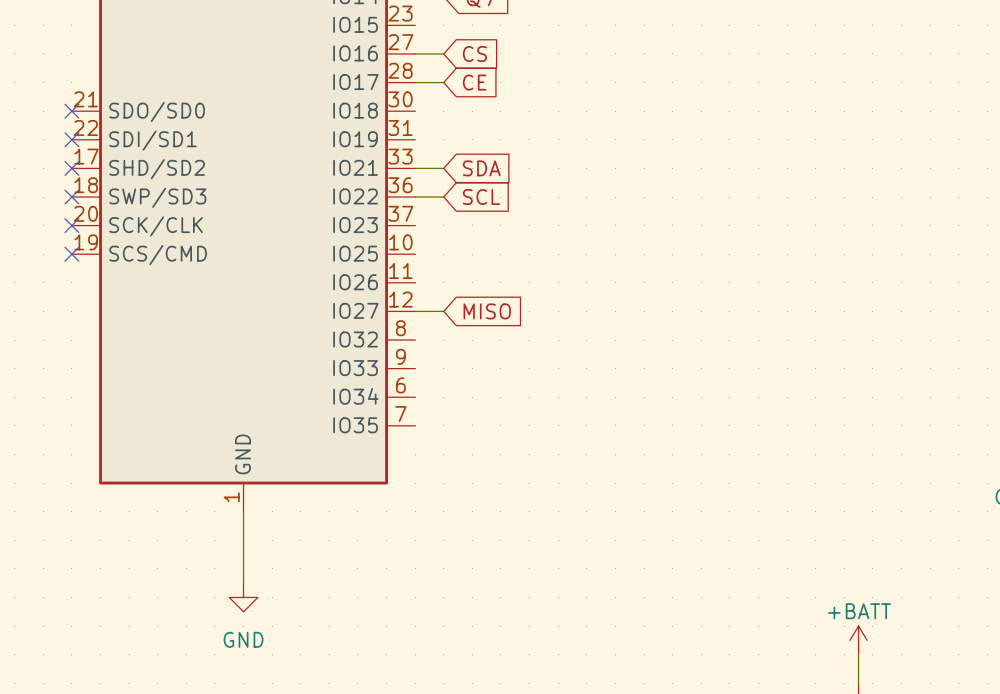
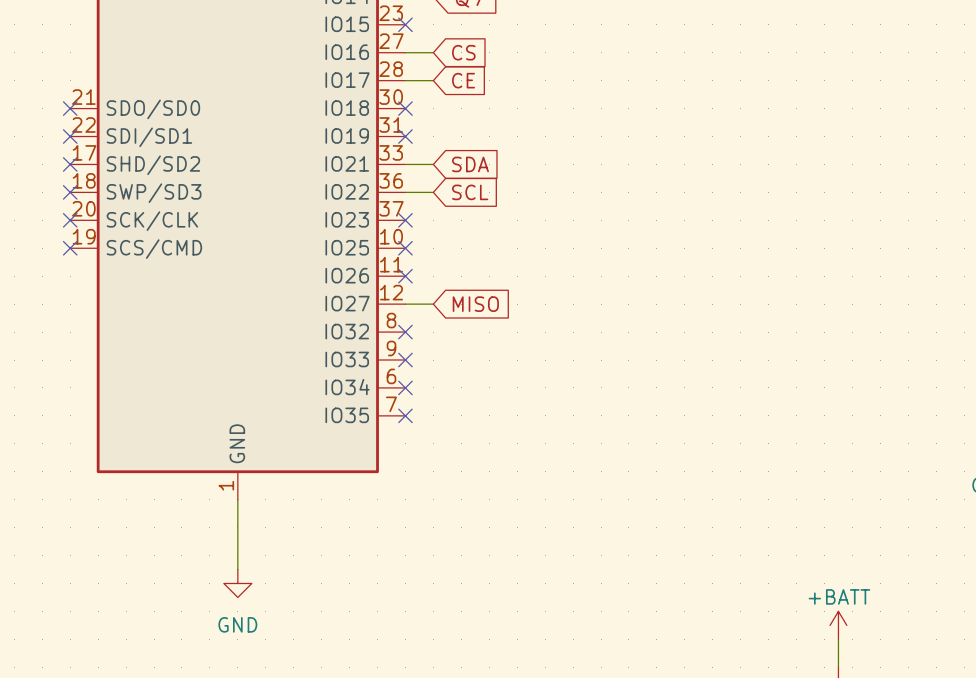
no-connect mark: none -> (405, 24)
no-connect mark: none -> (405, 108)
no-connect mark: none -> (405, 136)
no-connect mark: none -> (405, 220)
no-connect mark: none -> (405, 248)
no-connect mark: none -> (405, 276)
no-connect mark: none -> (405, 332)
no-connect mark: none -> (405, 360)
no-connect mark: none -> (405, 387)
no-connect mark: none -> (405, 415)

